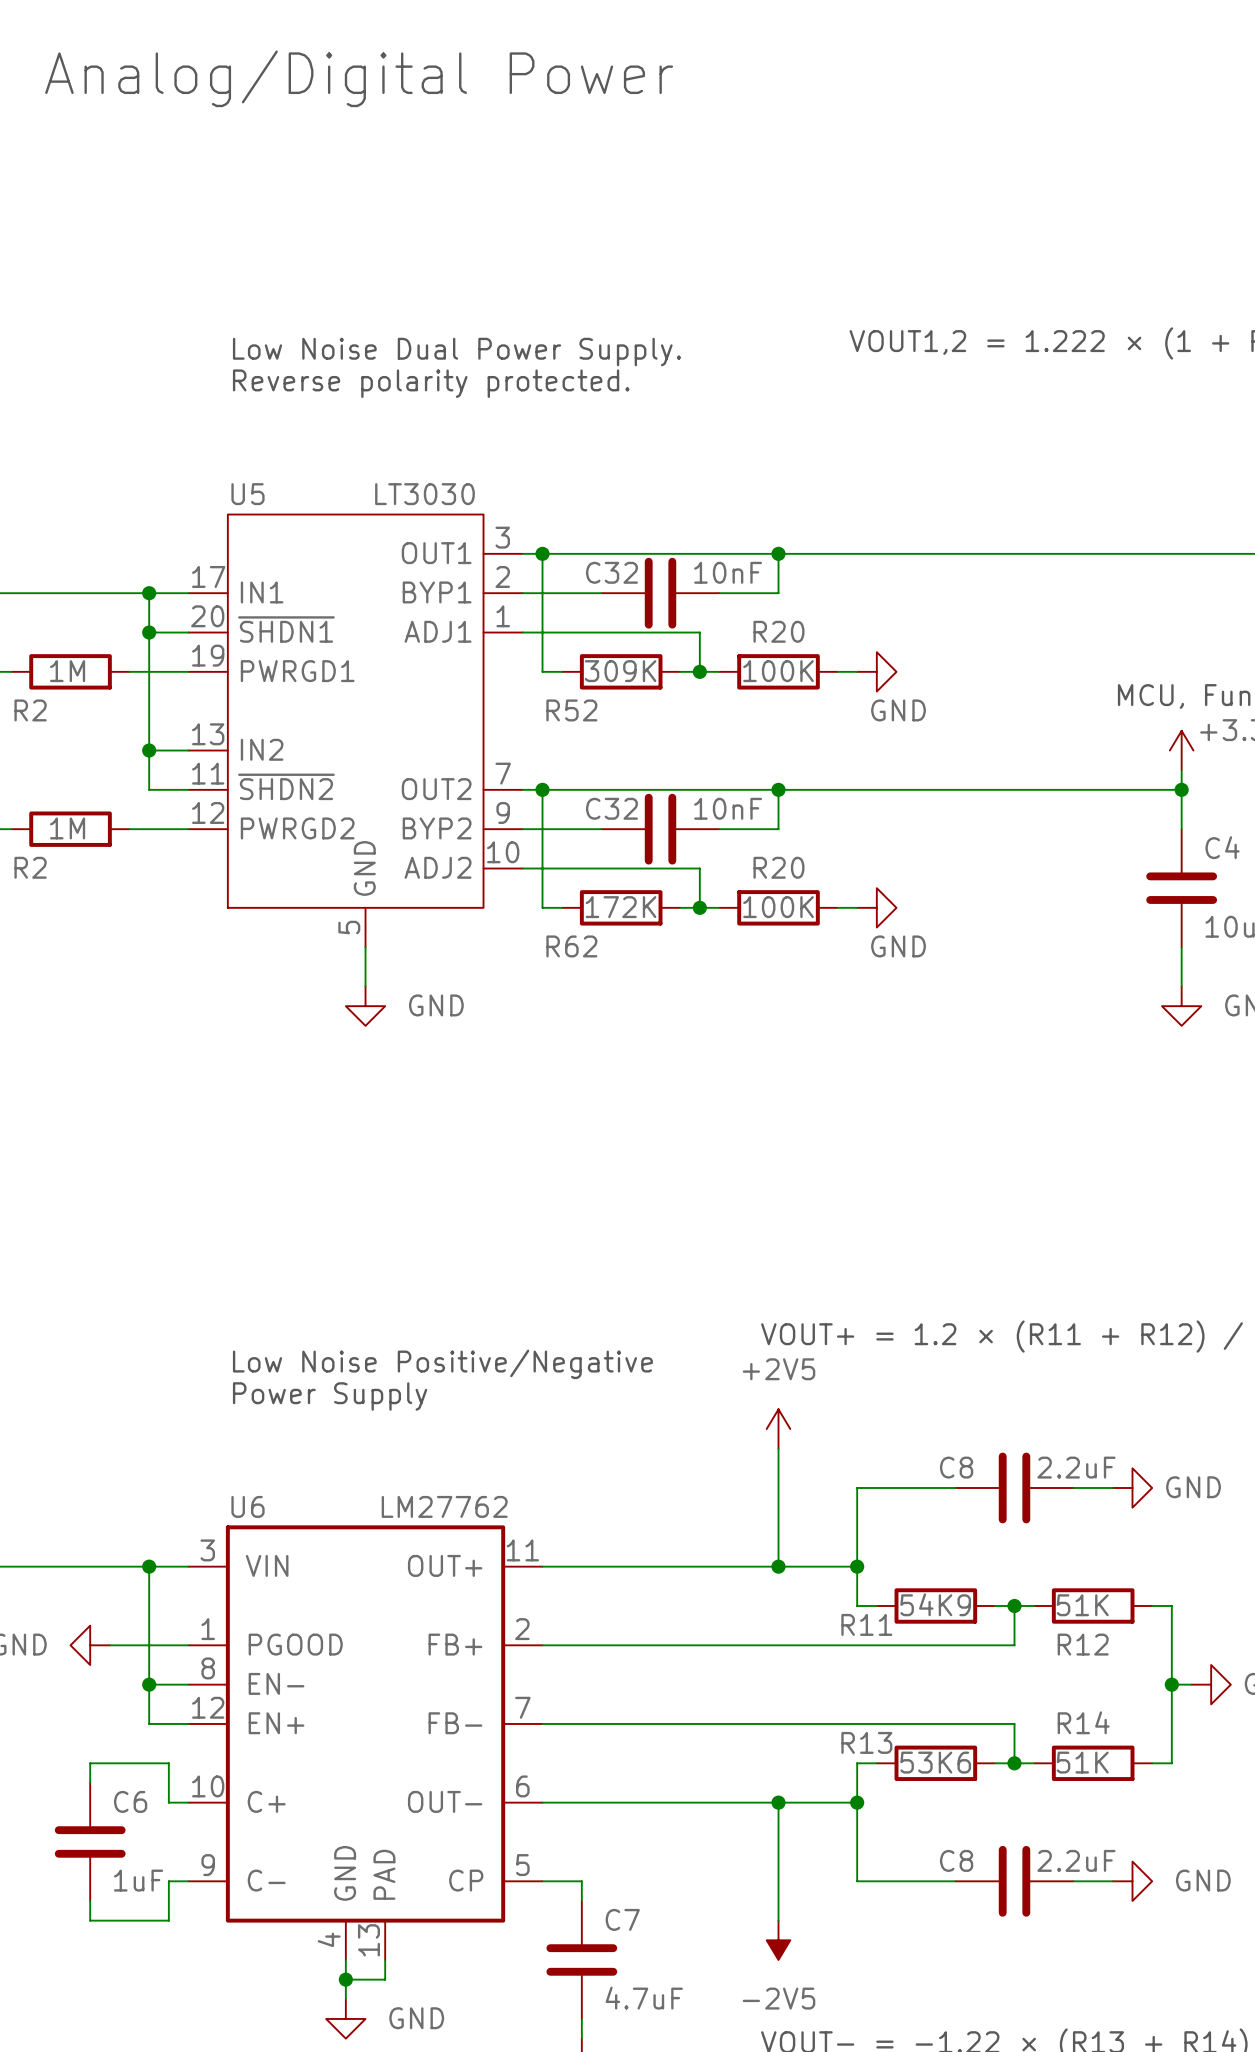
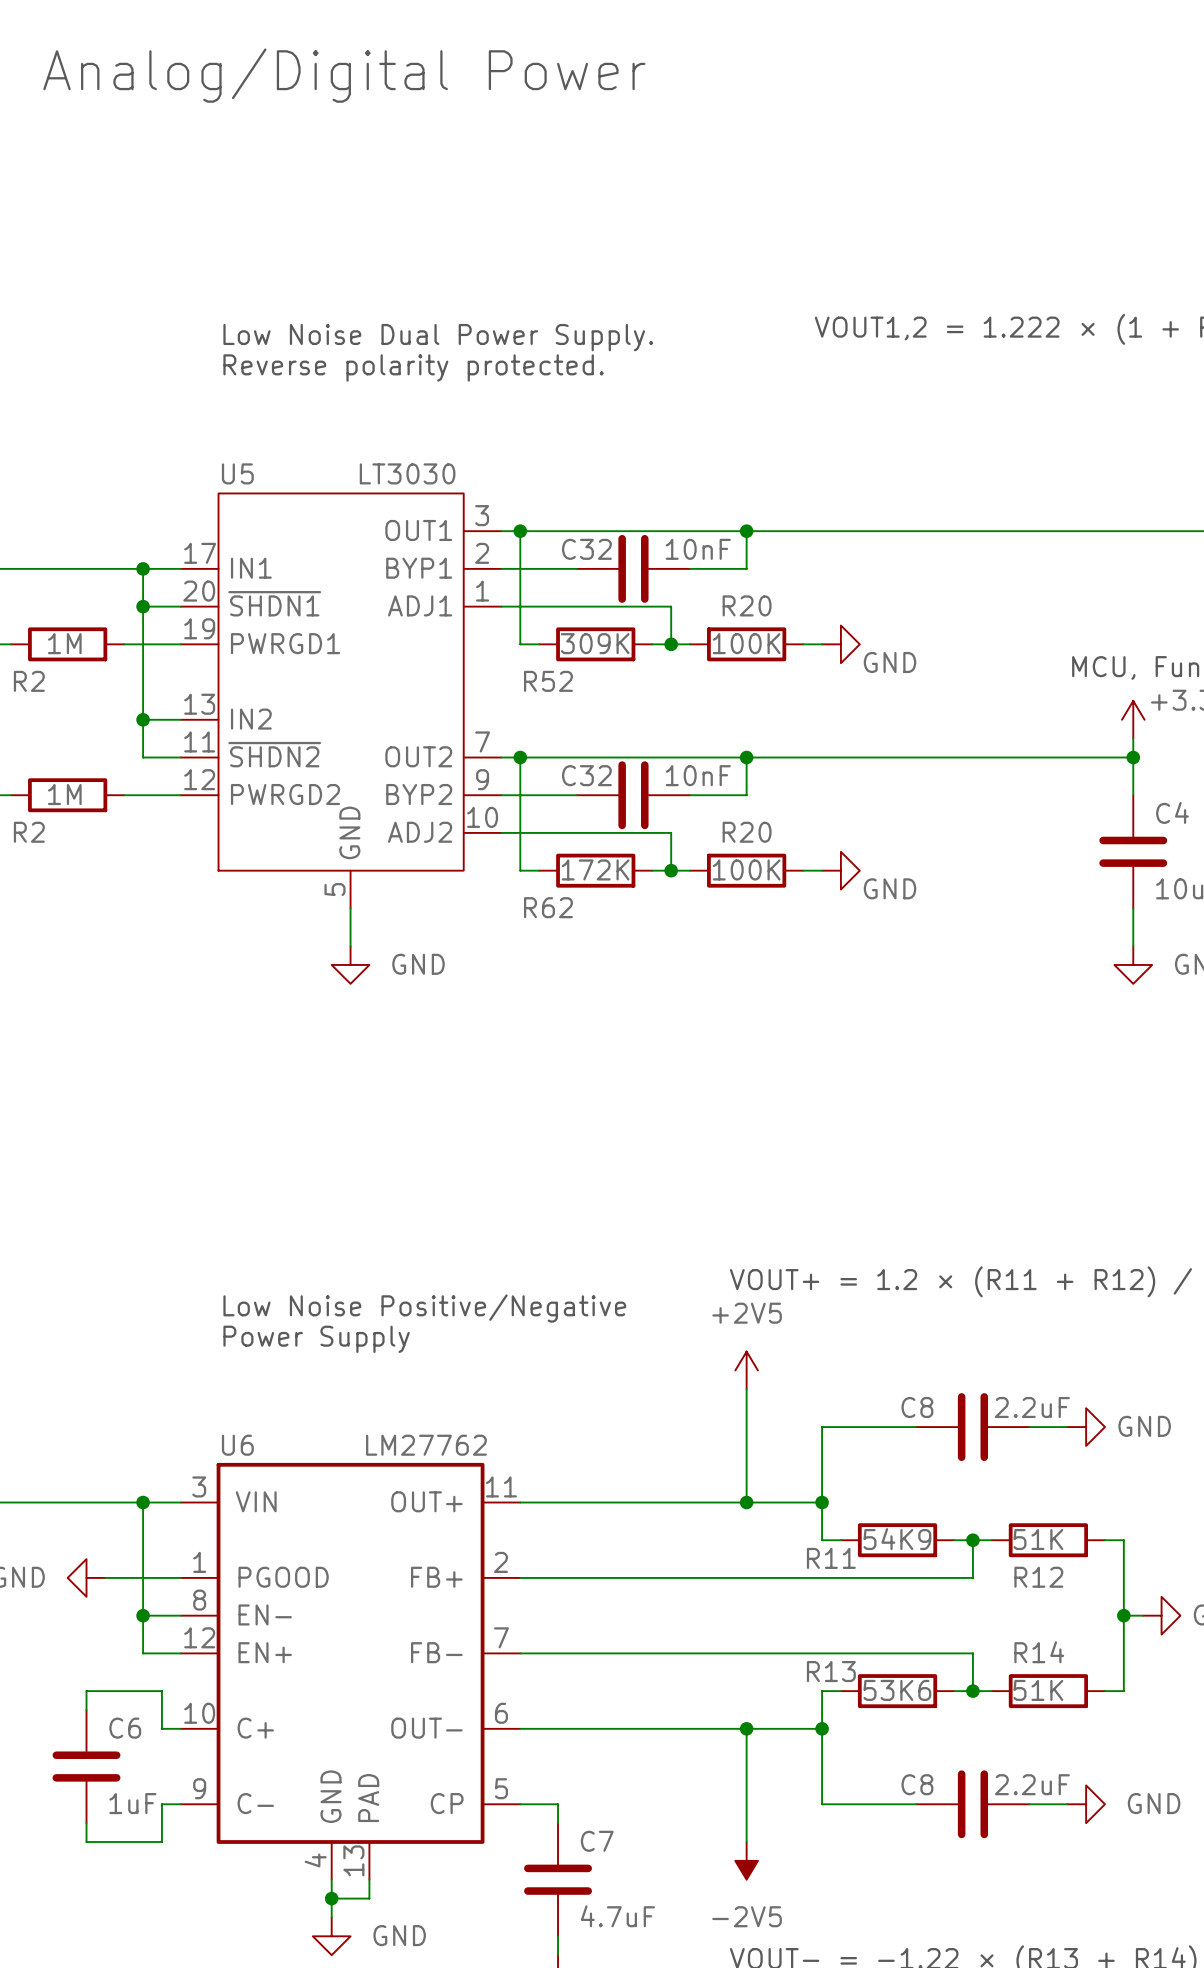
power symbol text position: GND (898, 710) -> GND (890, 662)
power symbol text position: GND (898, 946) -> GND (890, 888)

